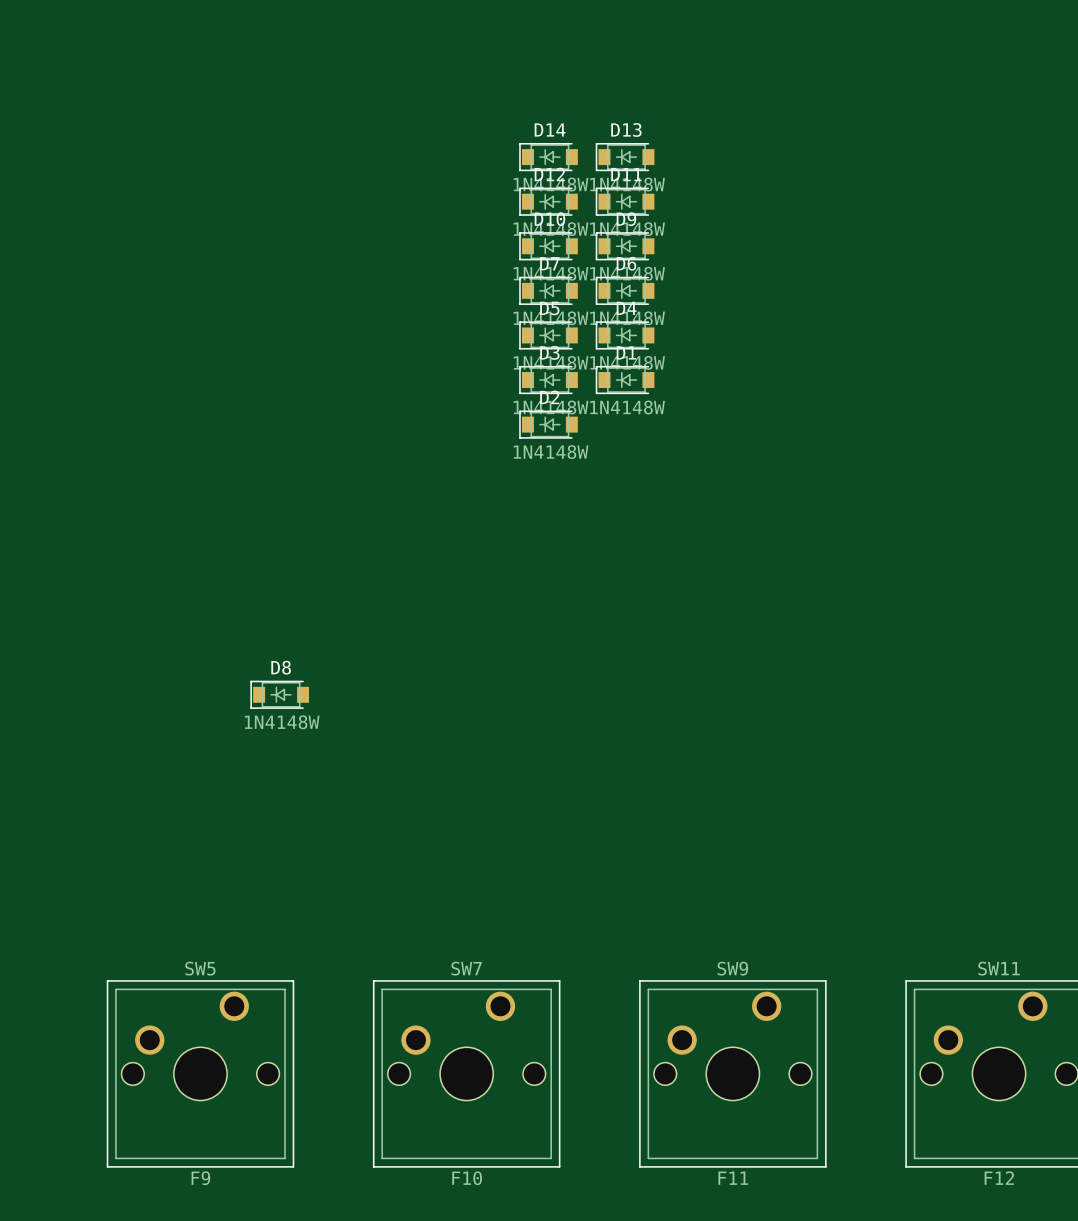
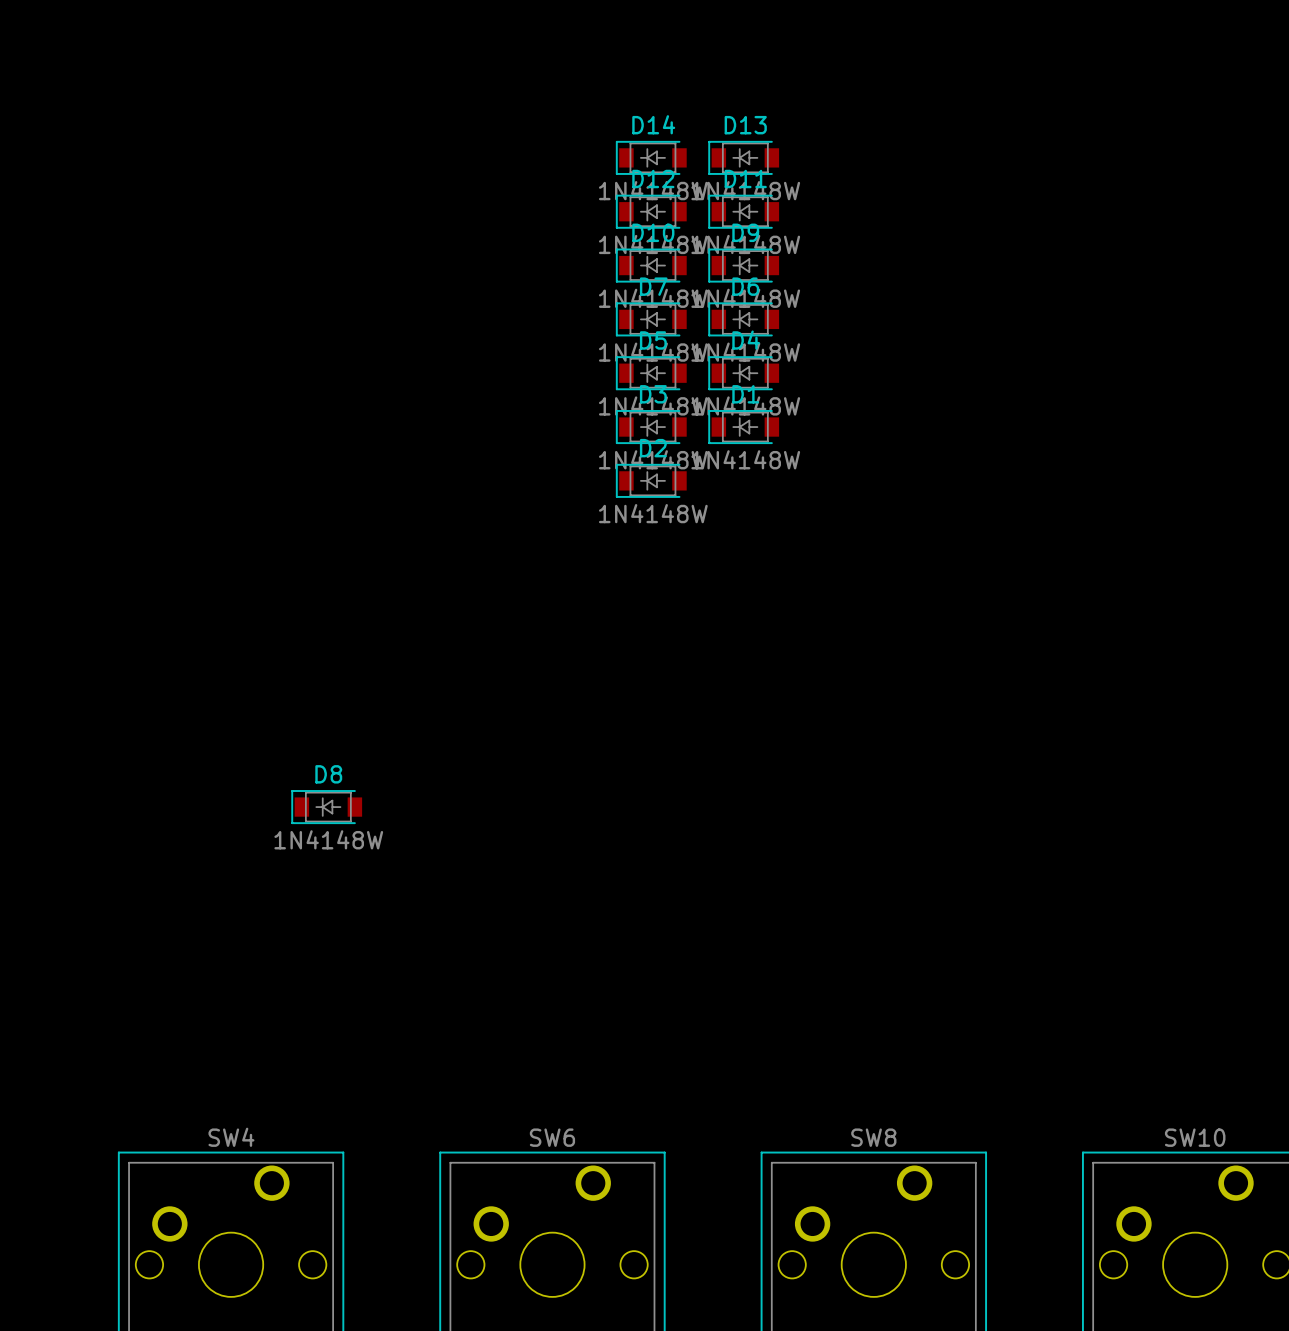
SW5 name: SW5 (200, 968) -> SW4 (231, 1137)
SW7 name: SW7 (466, 968) -> SW6 (552, 1137)
SW9 name: SW9 (732, 968) -> SW8 (873, 1137)
SW11 name: SW11 (999, 968) -> SW10 (1195, 1137)

